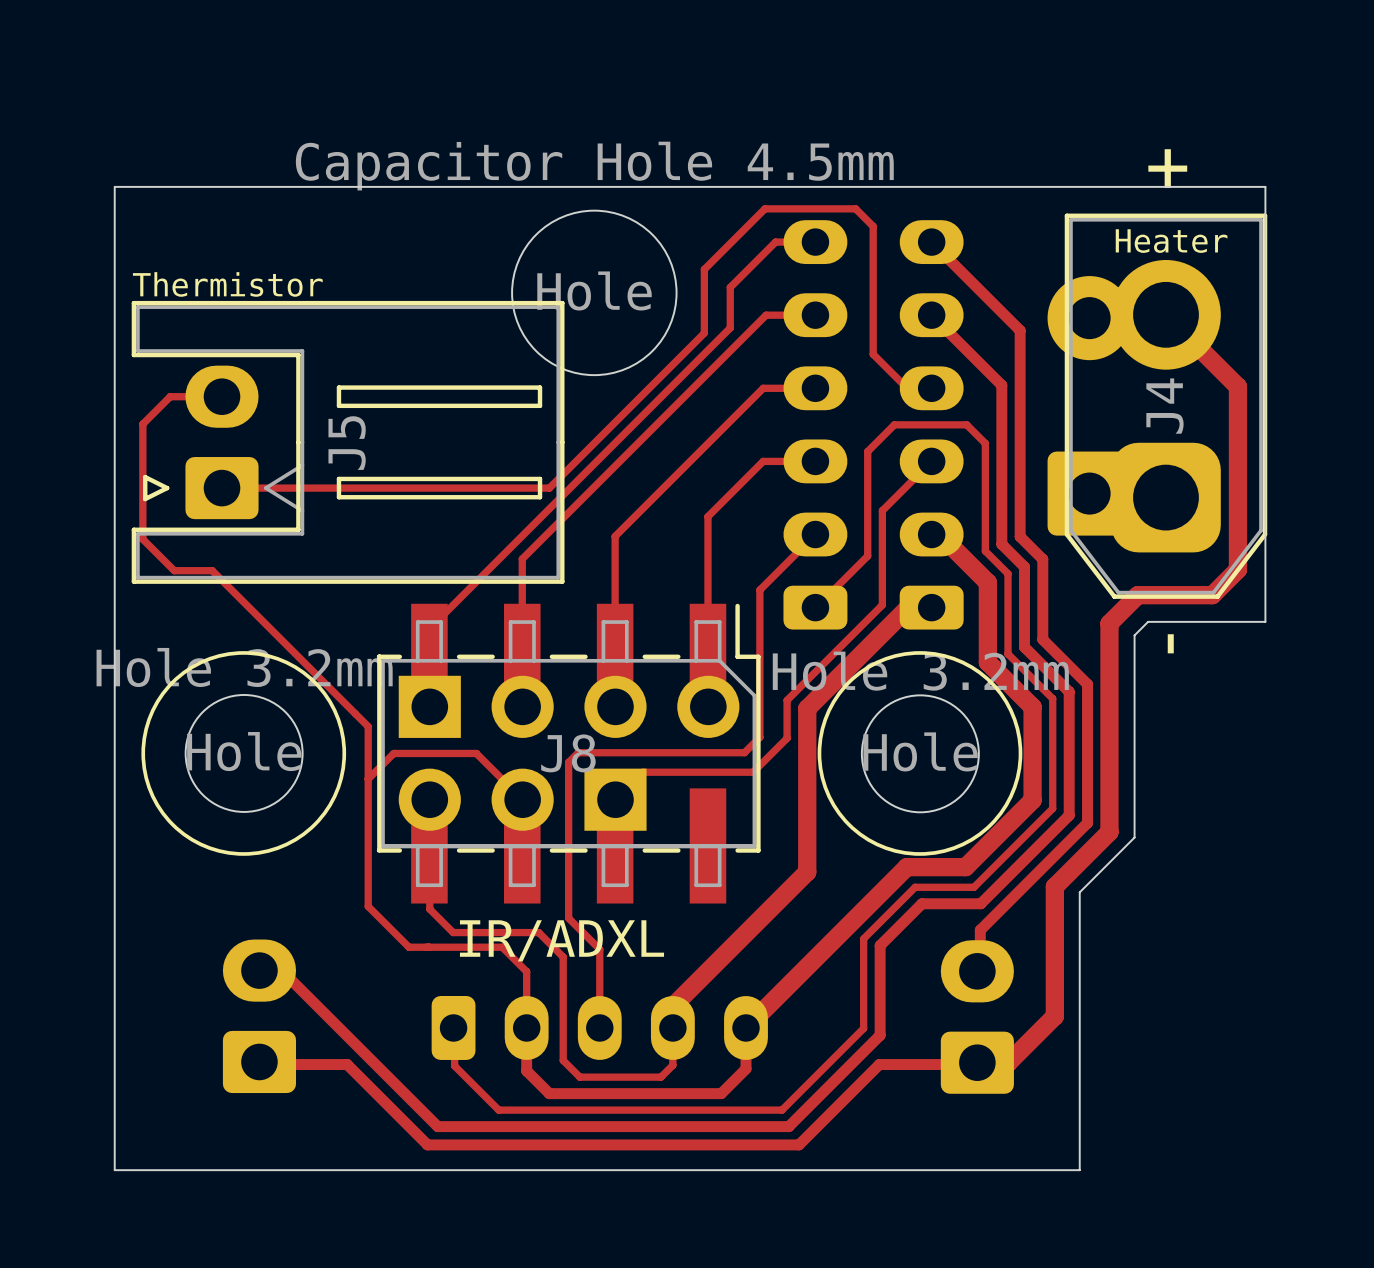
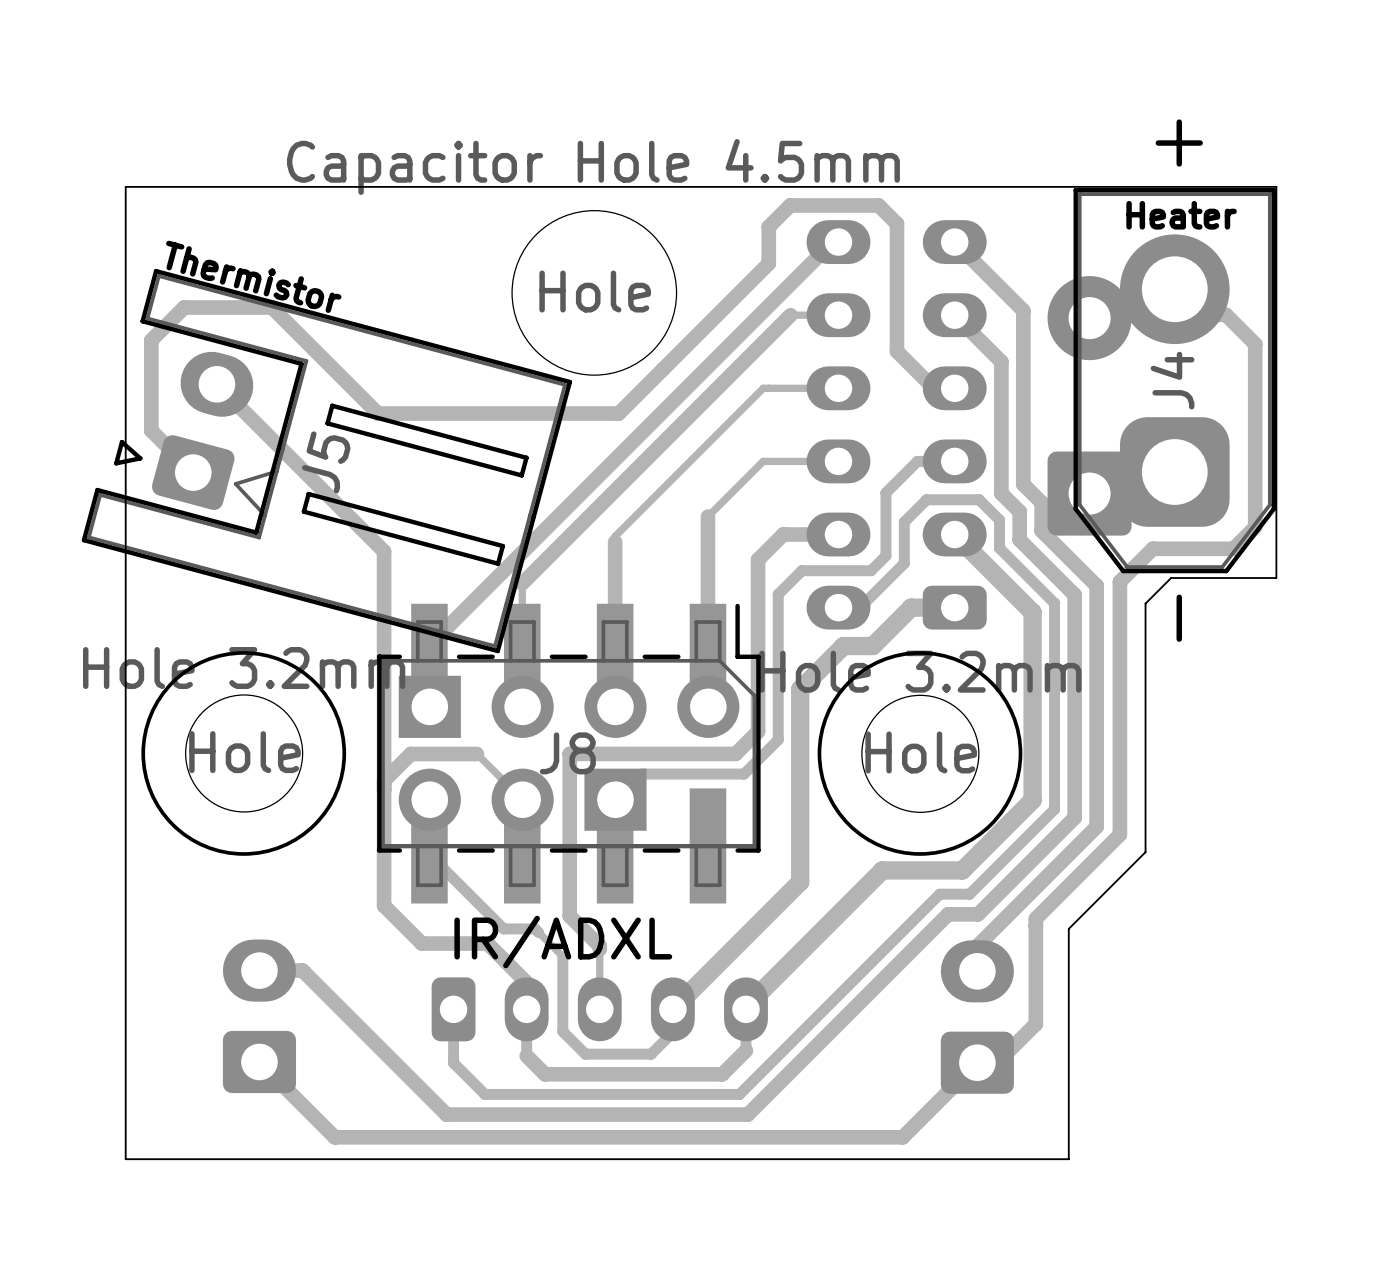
board edge: (125, 186) (114, 186) (114, 1170) (1079, 1170) (1079, 892) (1134, 837) (1134, 635) (1148, 621) (1265, 621) (1265, 186) -> (125, 186) (125, 1159) (1068, 1159) (1068, 928) (1145, 852) (1145, 603) (1171, 578) (1276, 578) (1276, 186) (1265, 186)
part footprint: [783, 220, 848, 630] -> [806, 220, 871, 630]
track: (815, 242) (775, 242) (730, 287) (730, 327) (429, 628) (429, 633) -> (815, 242) (815, 247)
track: none -> (838, 242) (832, 242) (429, 645)
track: (931, 242) (1020, 330) (1020, 536) (1042, 559) (1042, 639) (1087, 684) (1087, 823) (980, 930) (980, 968) (977, 971) -> (954, 242) (1023, 310) (1023, 484) (1041, 502) (1041, 530) (1096, 585) (1096, 826) (977, 946) (977, 971)
track: (1165, 314) (1237, 386) (1237, 569) (1212, 595) (1137, 595) (1109, 623) (1109, 832) (1054, 886) (1054, 1016) (1008, 1062) (997, 1062) -> (1174, 314) (1225, 314) (1255, 344) (1255, 527) (1233, 548) (1152, 548) (1119, 581) (1119, 834) (1035, 918) (1035, 1023) (997, 1062)
track: (790, 315) (766, 315) (522, 559) (522, 583) -> (790, 315) (522, 583)
track: (931, 315) (1001, 385) (1001, 544) (1024, 566) (1024, 647) (1069, 691) (1069, 815) (980, 903) (921, 903) (880, 945) (880, 1035) (788, 1126) (437, 1126) (281, 970) -> (954, 315) (1001, 361) (1001, 493) (1019, 511) (1019, 539) (1074, 594) (1074, 817) (978, 914) (948, 914) (747, 1114) (446, 1114) (302, 970) (281, 970)
track: (931, 388) (907, 388) (873, 354) (873, 226) (855, 208) (764, 208) (704, 269) (704, 333) (549, 488) (222, 488) -> none
track: none -> (954, 388) (933, 388) (896, 351) (896, 223) (878, 205) (790, 205) (768, 226) (768, 263) (618, 413) (377, 413) (271, 307) (184, 307) (151, 340) (151, 430) (193, 472)
track: (222, 396) (170, 396) (142, 424) (142, 539) (174, 570) (212, 570) (368, 726) (368, 906) (408, 947) (502, 947) (526, 971) (526, 982) -> (216, 384) (384, 551) (384, 905) (421, 943) (487, 943) (526, 982)
J4 position: (1165, 406) -> (1174, 380)
part position: (931, 424) -> (954, 424)
J5 rotation: 0° (348, 442) -> 15° clockwise (326, 461)
track: (931, 461) (882, 510) (882, 605) (787, 700) (787, 738) (753, 772) (642, 772) (641, 774) -> (954, 461) (917, 461) (885, 492) (885, 555) (871, 570) (801, 570) (778, 594) (778, 739) (744, 774) (641, 774)
track width: thin (707, 516) (707, 661) -> thick (707, 516) (707, 661)
track: (815, 534) (759, 590) (759, 737) (744, 752) (578, 752) (568, 762) (568, 918) (599, 949) -> (838, 534) (783, 534) (758, 559) (758, 731) (735, 753) (569, 753) (569, 916) (599, 946) (599, 949)
track: (939, 534) (987, 582) (987, 662) (1032, 707) -> (954, 534) (1032, 612) (1032, 707)
track width: thin (615, 542) (615, 661) -> thick (615, 542) (615, 661)
track: (816, 607) (867, 556) (867, 451) (894, 424) (966, 424) (985, 443) (985, 551) (1008, 573) (1008, 653) (1052, 698) (1052, 808) (974, 887) (915, 887) (863, 938) (863, 1028) (782, 1110) (498, 1110) (454, 1065) (453, 1027) -> none
track: none -> (838, 607) (860, 607) (904, 563) (904, 522) (926, 499) (979, 499) (999, 520) (999, 548) (1054, 603) (1054, 809) (969, 894) (939, 894) (739, 1094) (484, 1094) (453, 1063) (453, 1009)
track: (931, 607) (907, 607) (807, 708) (807, 872) (670, 1008) -> none
track: none -> (954, 607) (911, 607) (872, 646) (843, 646) (800, 689) (800, 882) (672, 1009) (672, 1027)
track: (476, 753) (393, 753) (368, 779) -> (476, 753) (410, 753) (384, 780)
track: (429, 856) (429, 909) (453, 932) (538, 932) -> (429, 845) (429, 854) (503, 928) (535, 928) (538, 932)
track: (965, 867) (906, 867) (745, 1027) -> (965, 867) (962, 870) (882, 870) (745, 1006) (745, 1027) (745, 1009)
track: (563, 957) (563, 1060) (579, 1077) (661, 1077) (672, 1065) (672, 1032) -> (562, 956) (562, 1031) (585, 1054) (651, 1054) (672, 1032)
part position: (599, 1027) -> (599, 1009)
track: (745, 1050) (745, 1068) (721, 1093) (549, 1093) (526, 1070) (526, 1055) -> (745, 1050) (722, 1074) (545, 1074) (526, 1055)
track: (263, 1064) (347, 1064) (427, 1144) (799, 1144) (879, 1064) (975, 1064) -> (259, 1061) (334, 1137) (902, 1137) (975, 1064)

